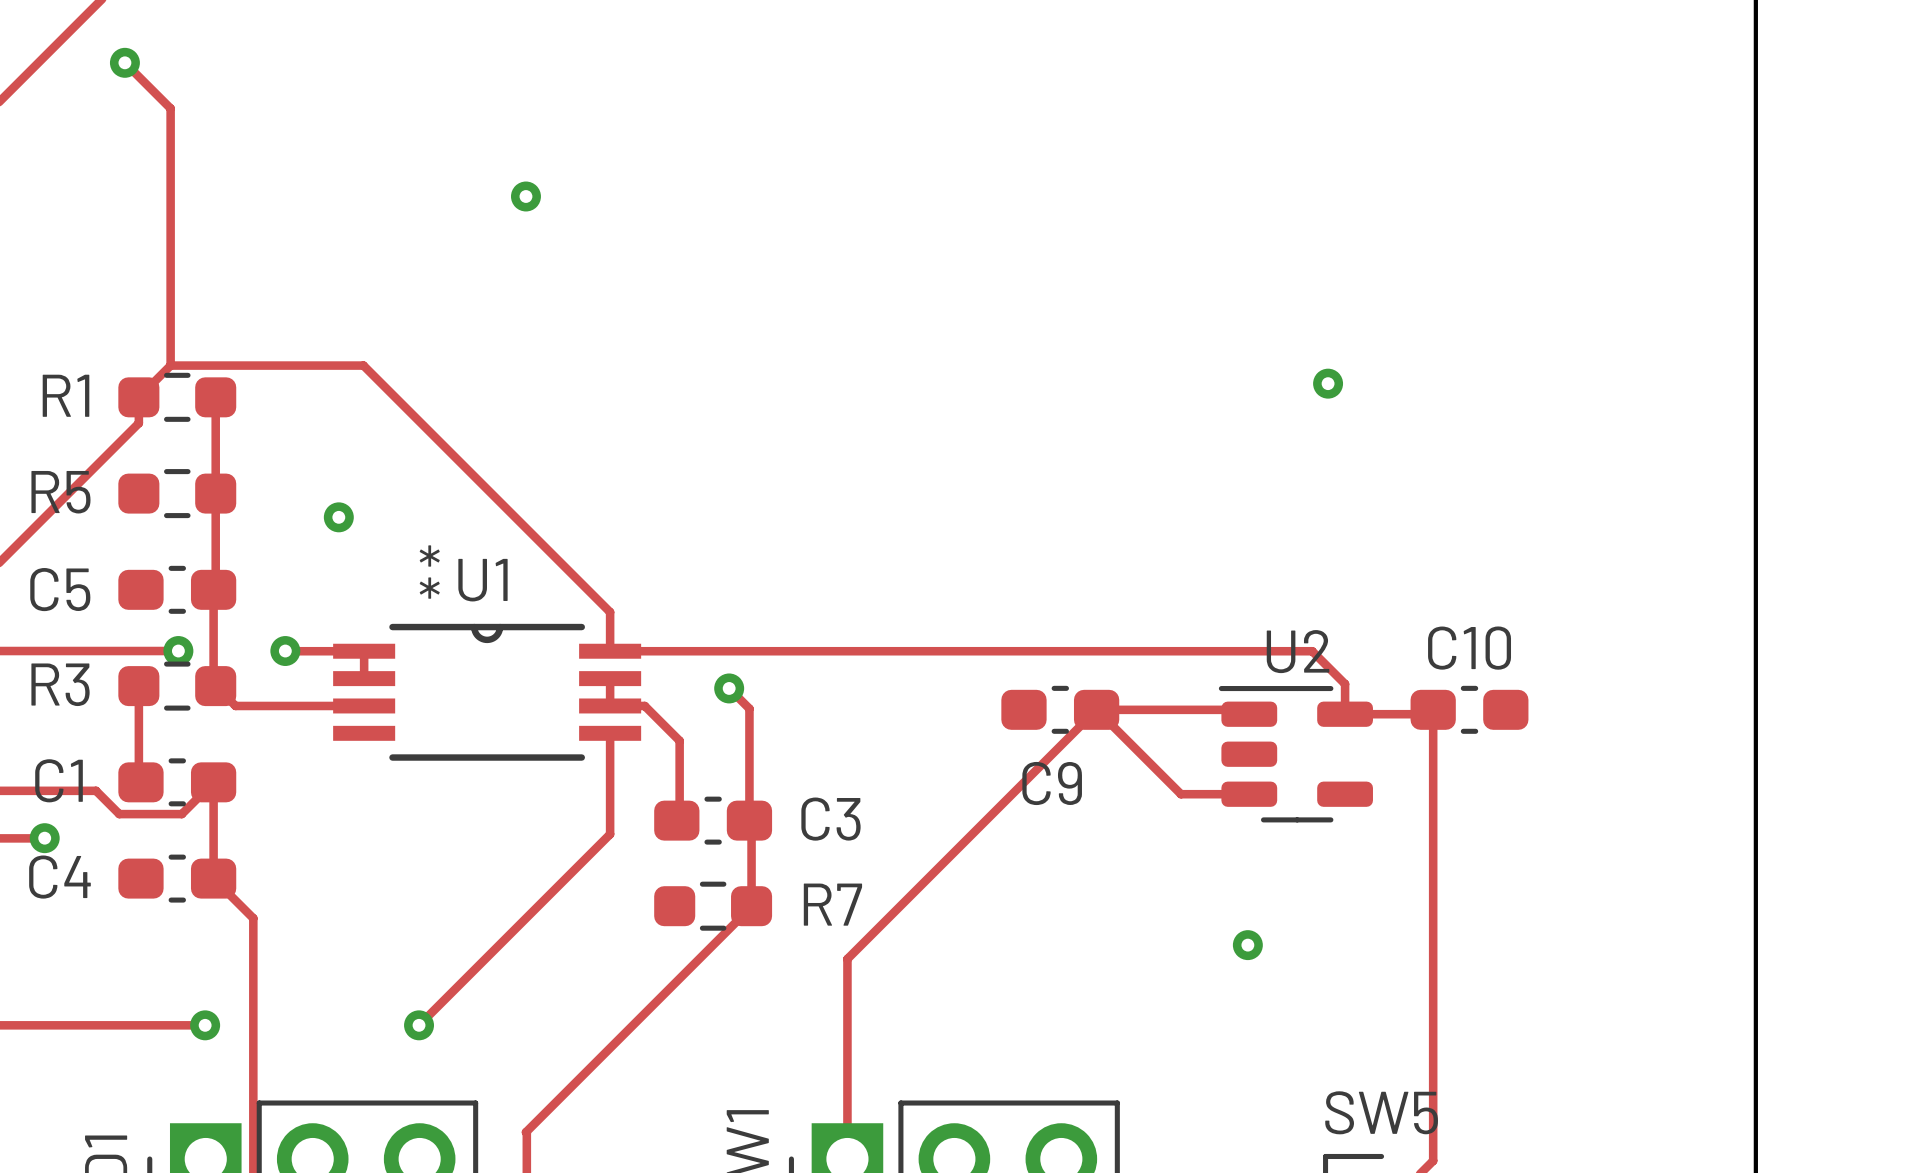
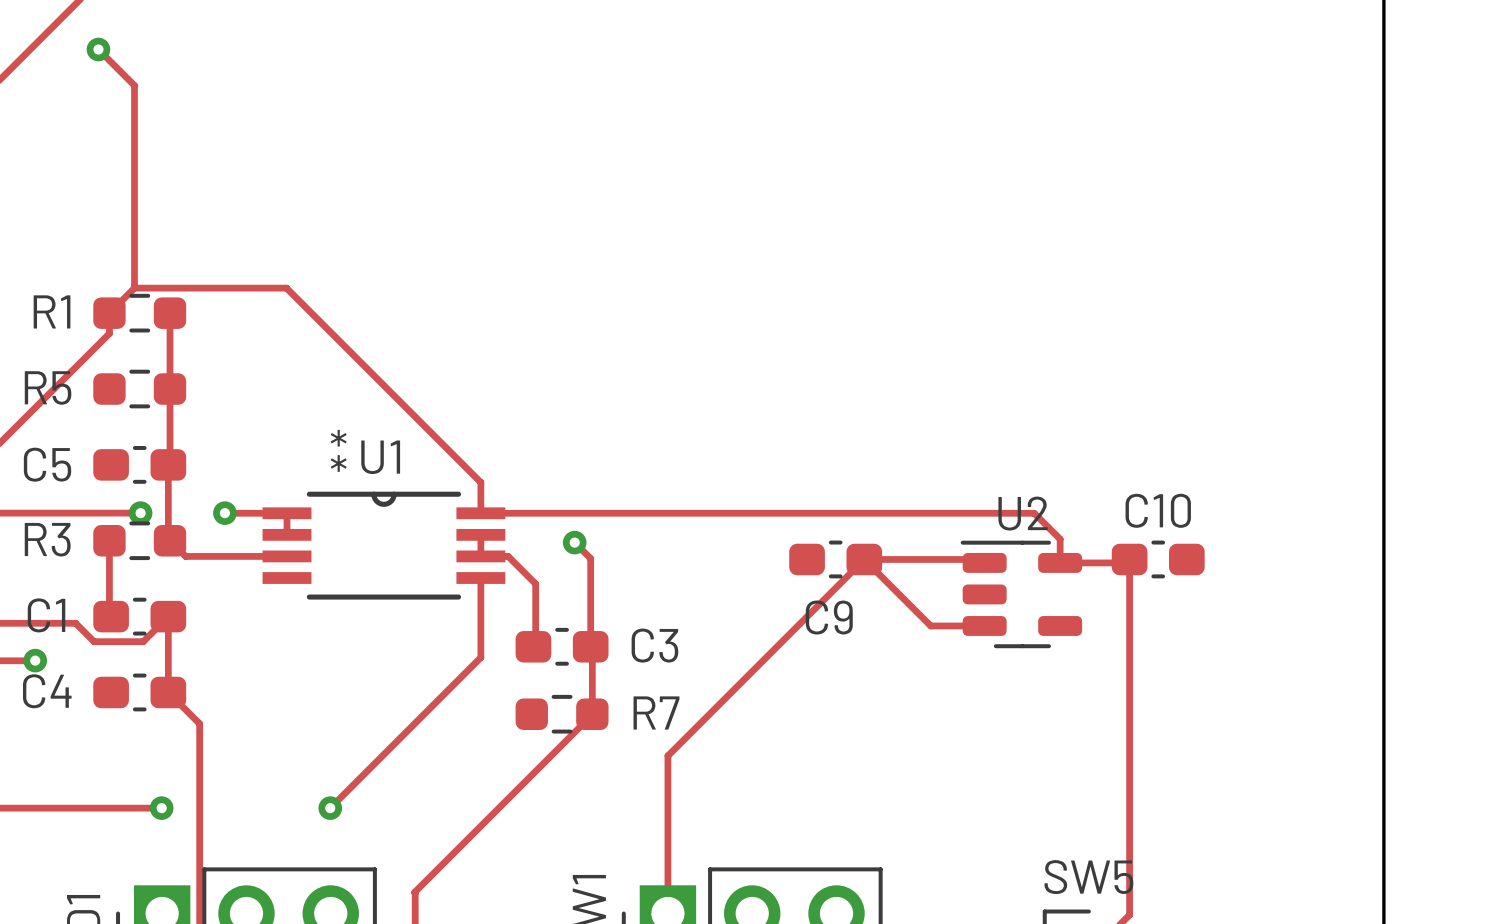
via: (525, 196) -> none
via: (1328, 383) -> none
via: (338, 517) -> none
via: (1247, 945) -> none

